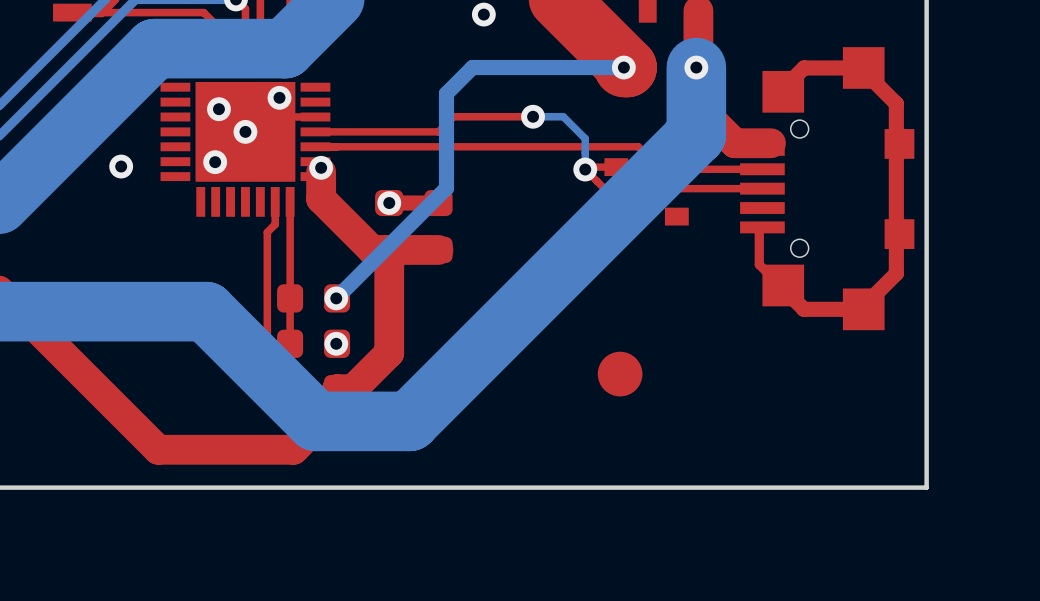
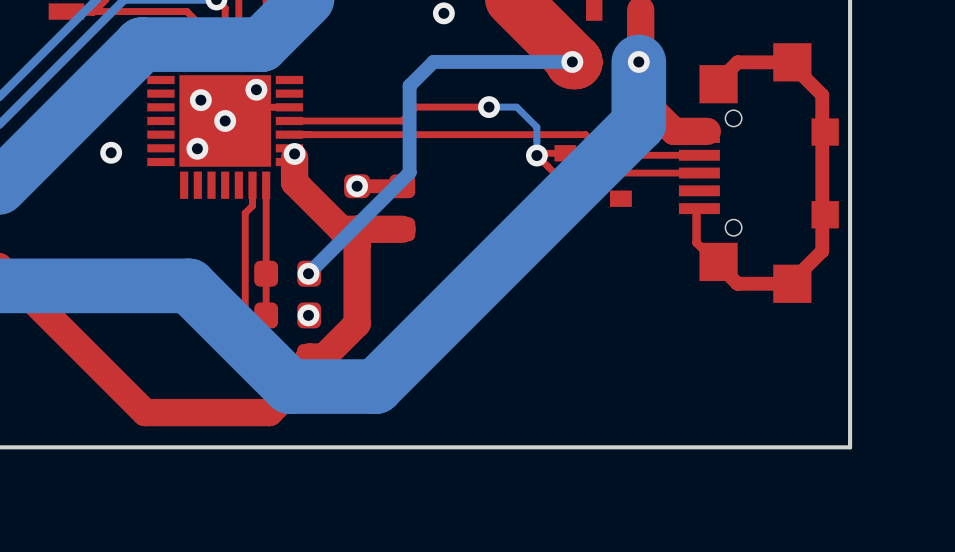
part: (620, 374) -> none

